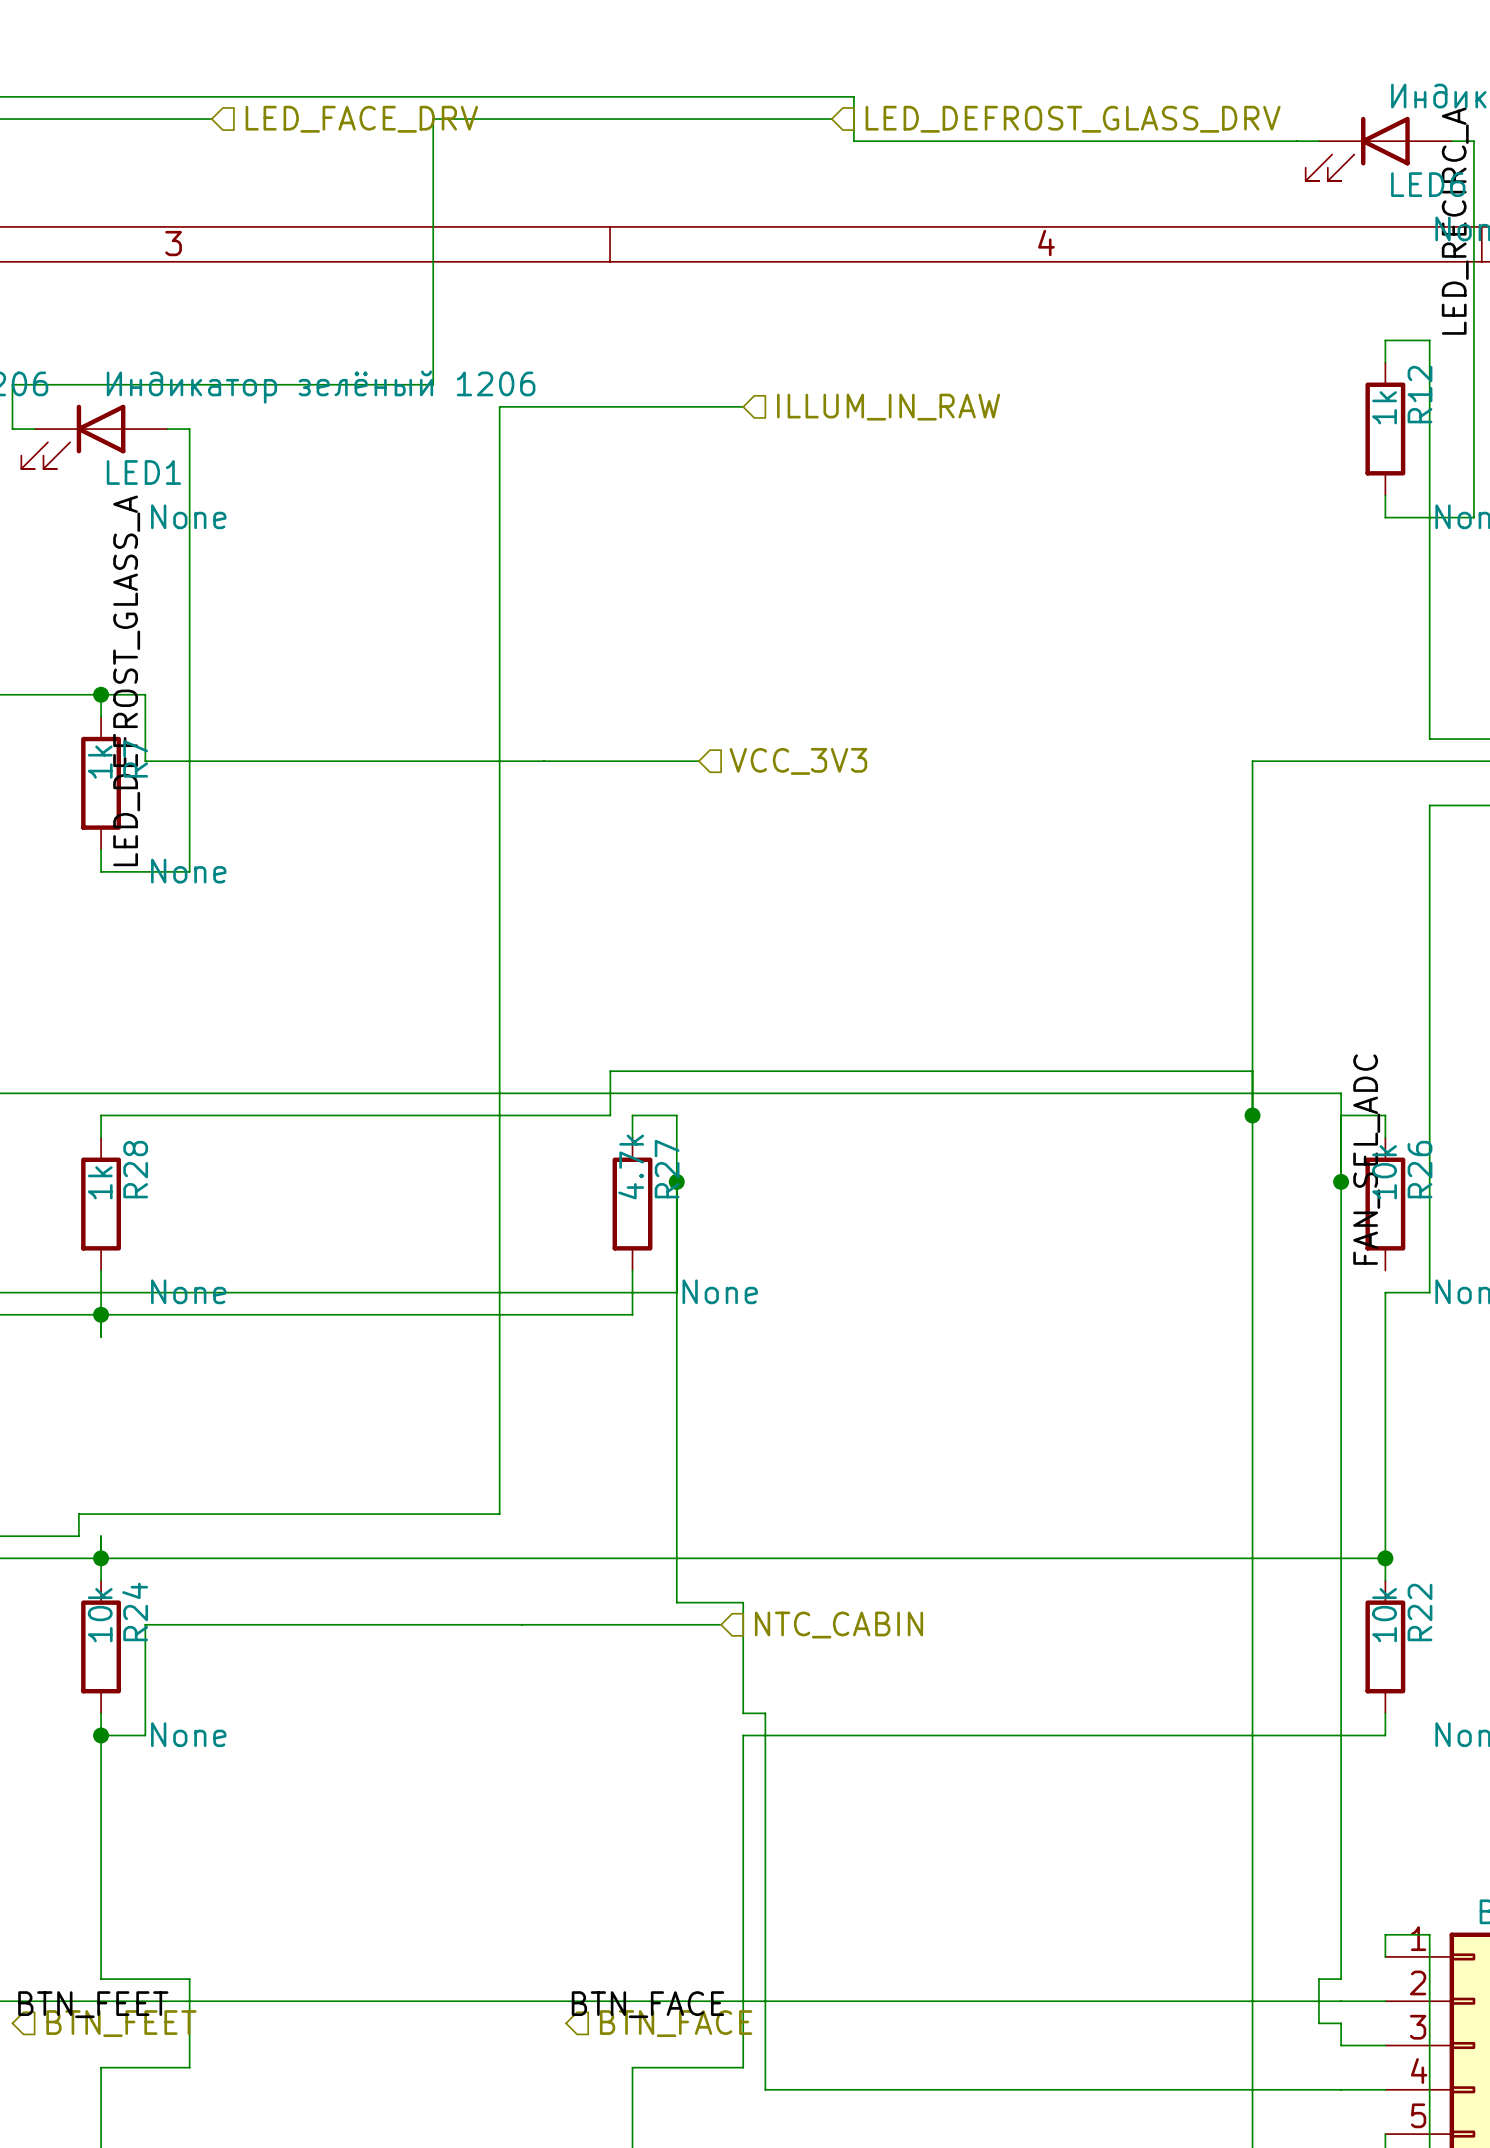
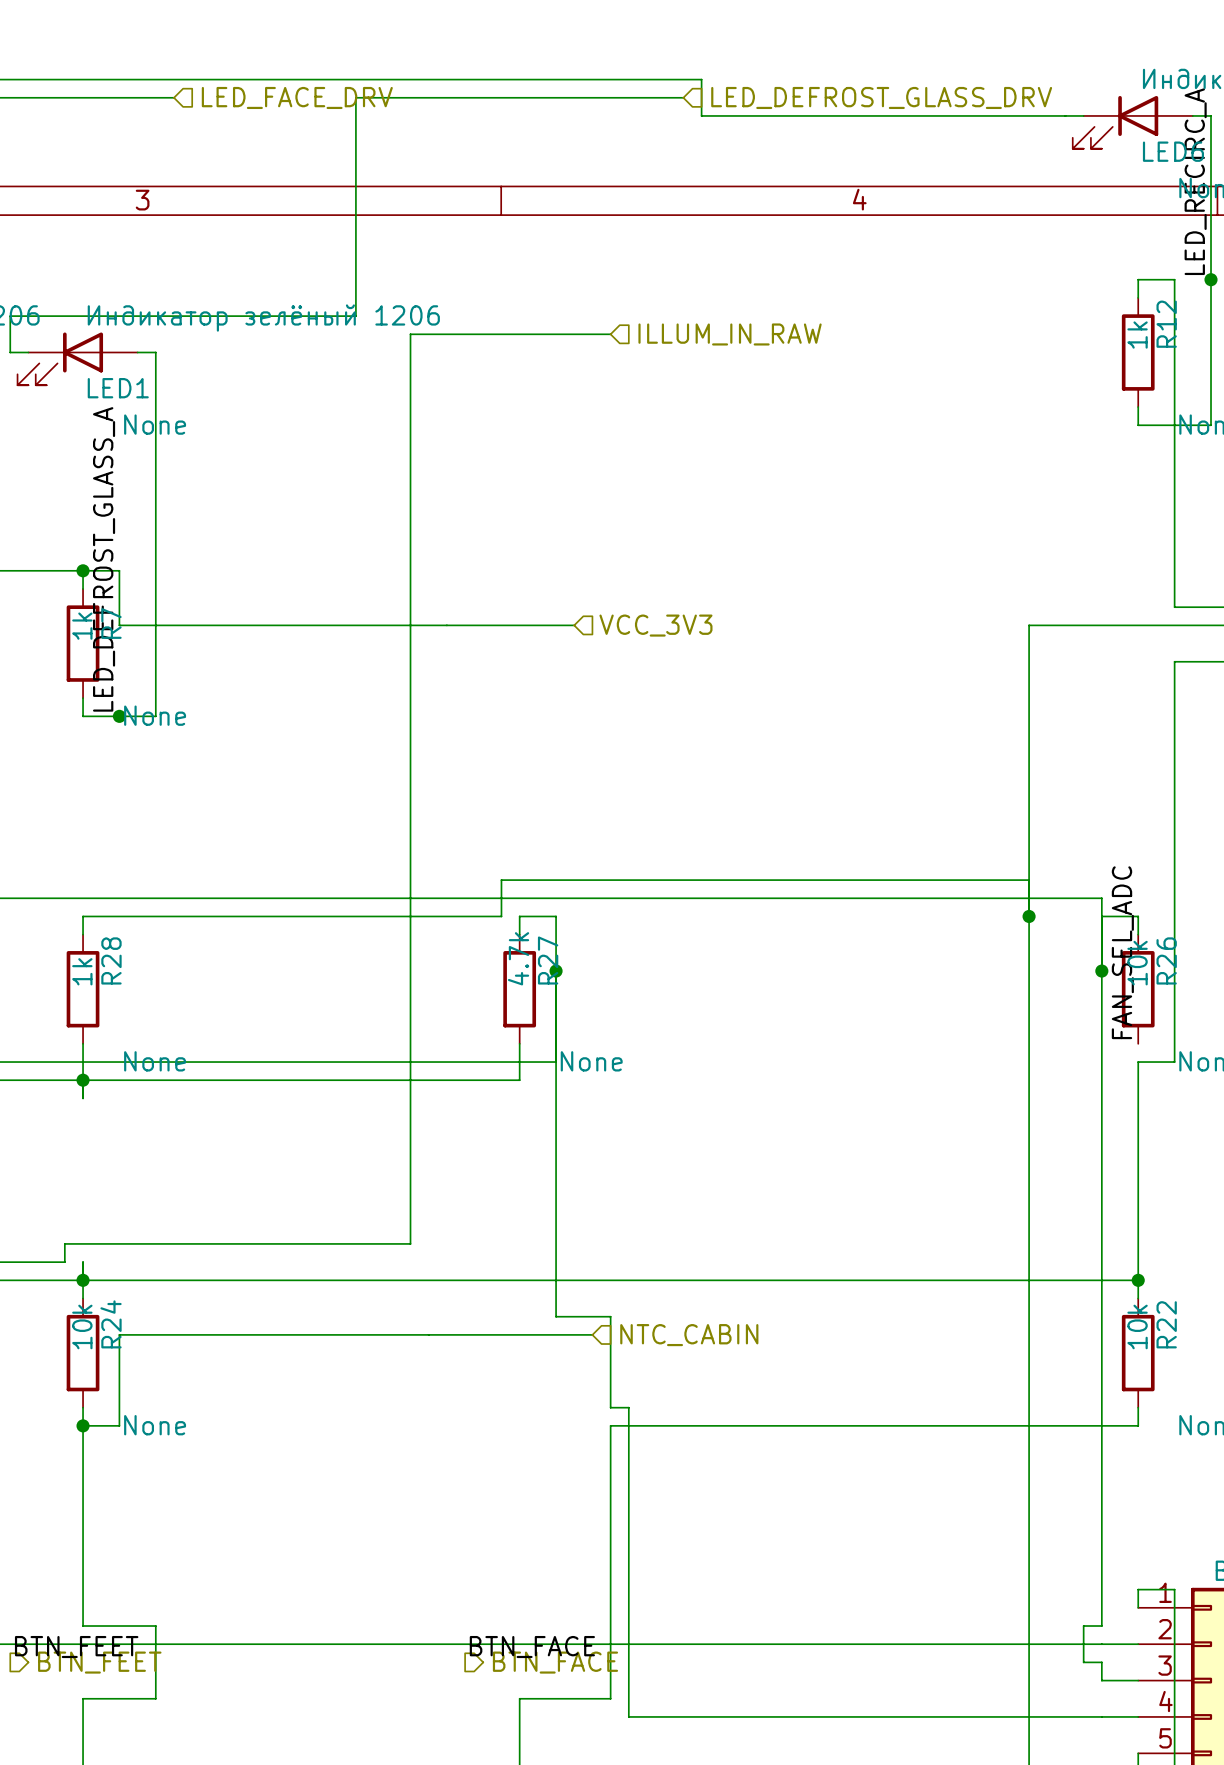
junction: none -> (1211, 279)
junction: none -> (119, 716)
hierarchical label shape: input (121, 2023) -> output (99, 1662)
hierarchical label shape: input (676, 2023) -> output (555, 1662)

